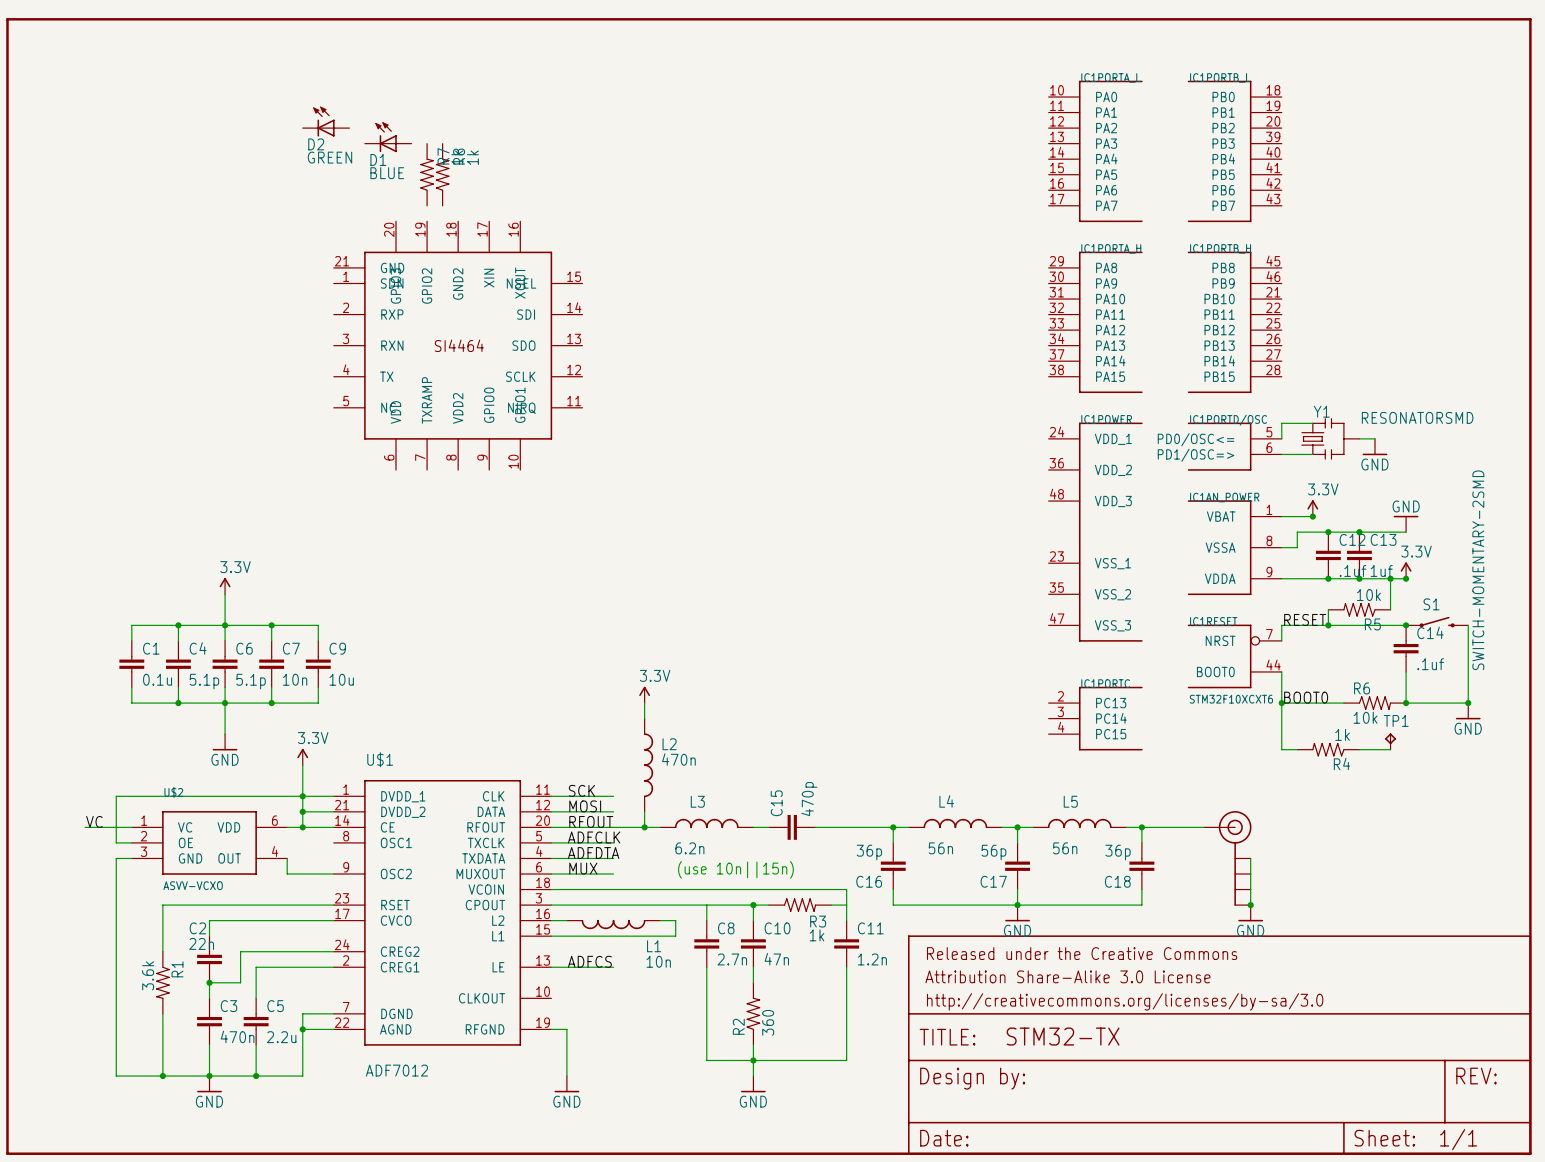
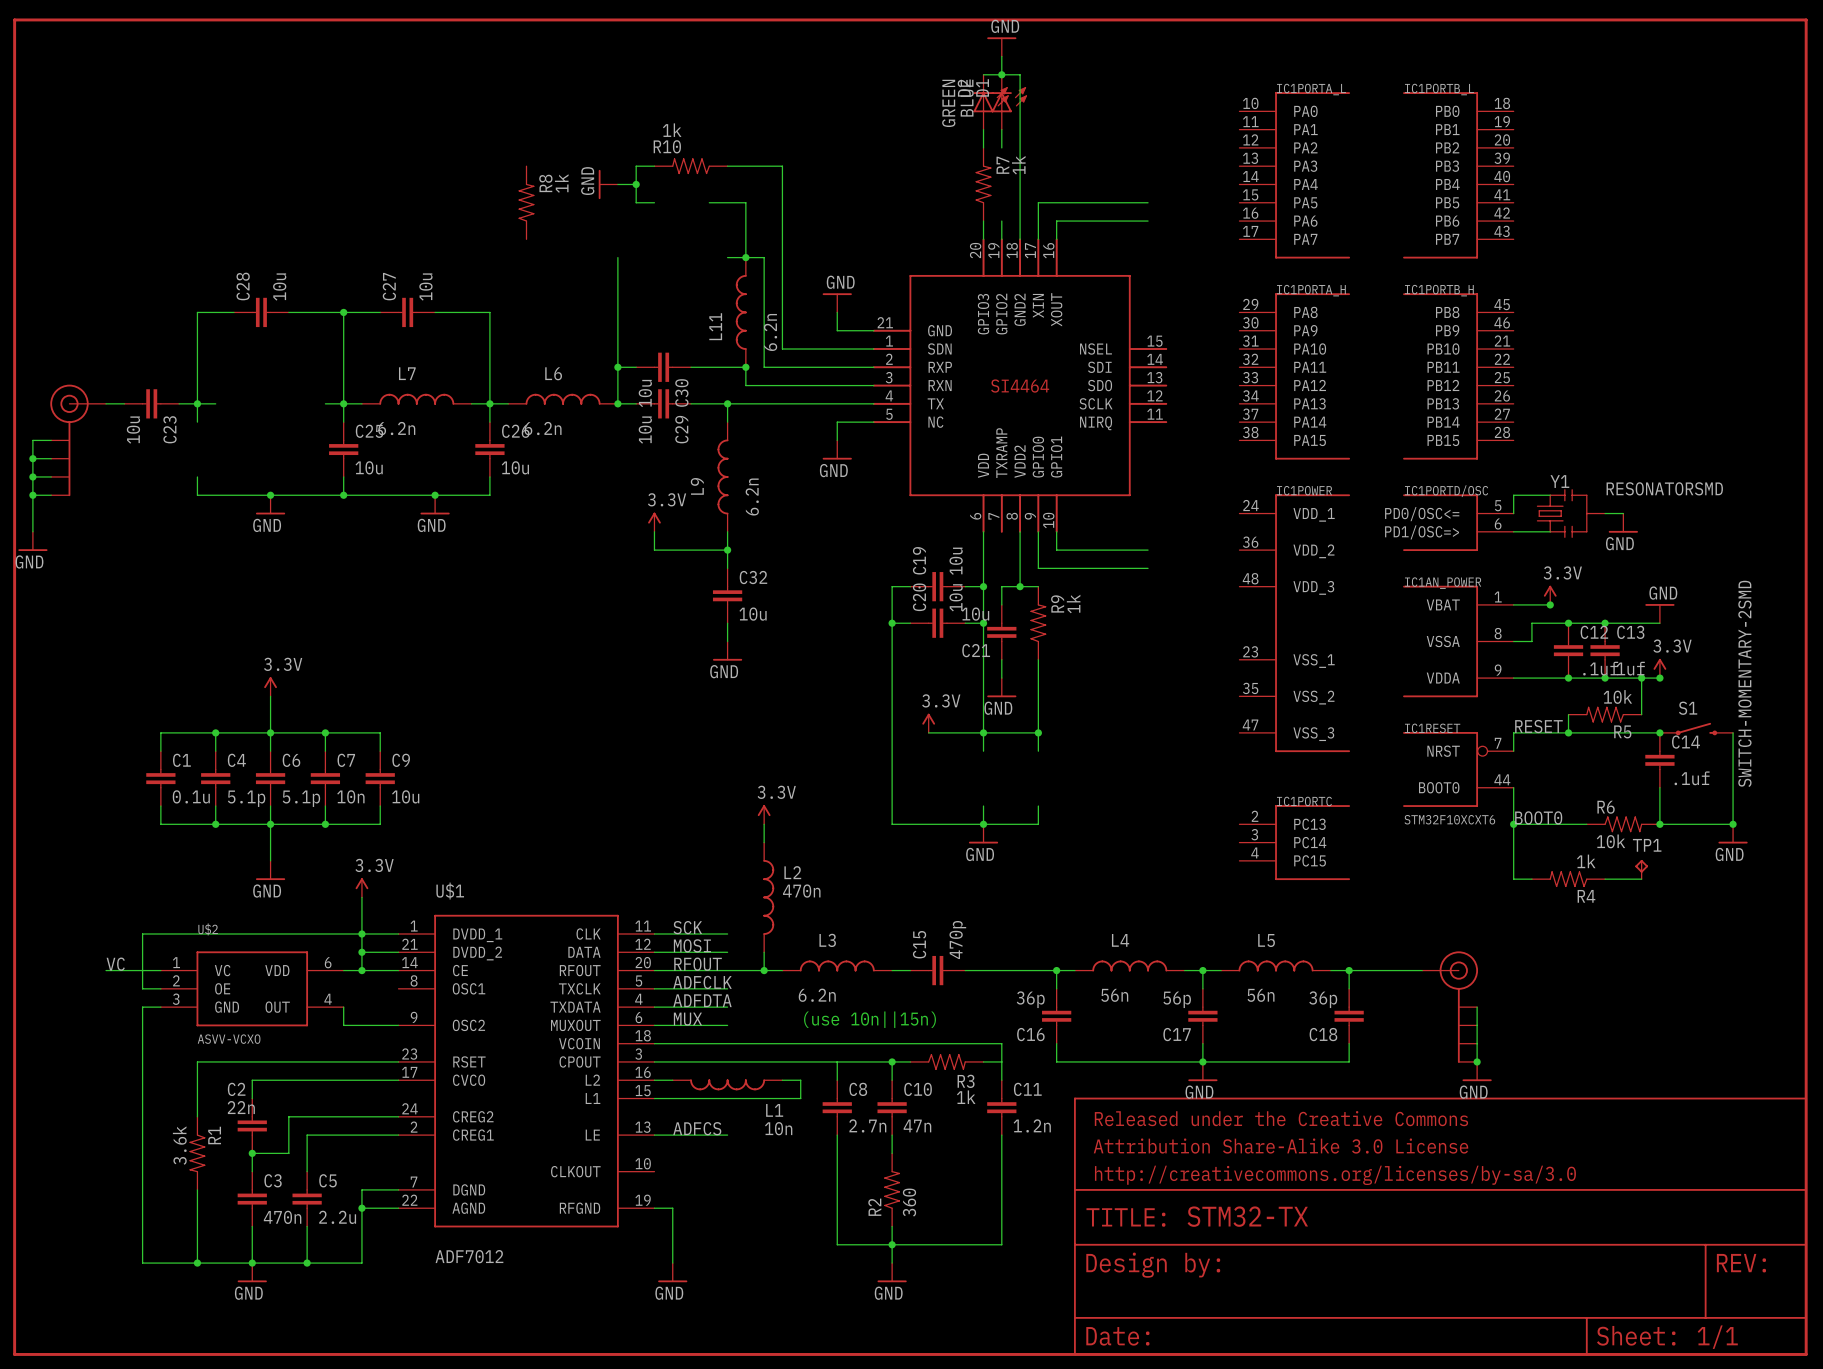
power symbol: none -> GND (1001, 46)
wire: none -> (1001, 56) (1001, 74)
wire: none -> (983, 74) (1020, 74) (1020, 239)
junction: none -> (1001, 74)
wire: none -> (983, 129) (983, 147)
wire: none -> (1001, 129) (1001, 147)
D2 rotation: 0° (323, 121) -> 90° clockwise (991, 99)
D2 position: (326, 121) -> (991, 102)
D1 rotation: 0° (386, 137) -> 90° clockwise (1009, 99)
D1 position: (388, 137) -> (1009, 102)
wire: none -> (654, 166) (636, 166) (636, 202) (654, 202)
R10: none -> 1k (691, 166)
wire: none -> (727, 166) (782, 166) (782, 349) (873, 349)
power symbol: none -> GND (608, 184)
wire: none -> (617, 184) (636, 184)
junction: none -> (636, 184)
R7 position: (427, 174) -> (983, 184)
wire: none -> (709, 202) (745, 202) (745, 257)
wire: none -> (1148, 202) (1038, 202) (1038, 239)
wire: none -> (983, 221) (983, 239)
wire: none -> (1001, 221) (1001, 239)
wire: none -> (1148, 221) (1056, 221) (1056, 239)
wire: none -> (617, 257) (617, 403) (636, 403)
wire: none -> (727, 257) (764, 257) (764, 367) (873, 367)
junction: none -> (745, 257)
power symbol: none -> GND (837, 302)
wire: none -> (233, 312) (197, 312) (197, 422)
C28: none -> 10u (261, 312)
wire: none -> (288, 312) (380, 312)
wire: none -> (343, 312) (343, 422)
junction: none -> (343, 312)
C27: none -> 10u (407, 312)
wire: none -> (435, 312) (489, 312) (489, 422)
L11: none -> 6.2n (741, 312)
wire: none -> (837, 312) (837, 330) (873, 330)
wire: none -> (617, 367) (636, 367)
junction: none -> (617, 367)
C30: none -> 10u (663, 367)
wire: none -> (691, 367) (745, 367) (745, 385) (873, 385)
junction: none -> (745, 367)
part: none -> (1020, 385)
L7: none -> 6.2n (416, 399)
L6: none -> 6.2n (563, 399)
wire: none -> (106, 403) (124, 403)
C23: none -> 10u (151, 403)
wire: none -> (179, 403) (215, 403)
junction: none -> (197, 403)
wire: none -> (325, 403) (361, 403)
junction: none -> (343, 403)
wire: none -> (471, 403) (508, 403)
junction: none -> (489, 403)
part: (458, 345) -> none
junction: none -> (617, 403)
C29: none -> 10u (663, 403)
wire: none -> (691, 403) (873, 403)
wire: none -> (727, 403) (727, 422)
junction: none -> (727, 403)
wire: none -> (873, 422) (837, 422) (837, 440)
wire: none -> (51, 440) (32, 440) (32, 531)
part: none -> (78, 440)
C25: none -> 10u (343, 449)
C26: none -> 10u (489, 449)
power symbol: none -> GND (837, 450)
wire: none -> (32, 458) (51, 458)
junction: none -> (32, 458)
wire: none -> (32, 476) (51, 476)
junction: none -> (32, 476)
wire: none -> (197, 476) (197, 495) (489, 495) (489, 476)
wire: none -> (343, 476) (343, 495)
L9: none -> 6.2n (723, 476)
wire: none -> (32, 495) (51, 495)
junction: none -> (32, 495)
junction: none -> (270, 495)
junction: none -> (343, 495)
junction: none -> (435, 495)
power symbol: none -> GND (270, 504)
power symbol: none -> GND (435, 504)
power symbol: none -> 3.3V (654, 522)
wire: none -> (654, 531) (654, 550) (727, 550)
wire: none -> (727, 531) (727, 568)
wire: none -> (983, 531) (983, 751)
wire: none -> (1020, 531) (1020, 586)
wire: none -> (1038, 531) (1038, 568) (1148, 568)
wire: none -> (1056, 531) (1056, 550) (1148, 550)
power symbol: none -> GND (32, 541)
junction: none -> (727, 550)
wire: none -> (910, 586) (892, 586) (892, 824) (1038, 824) (1038, 806)
C19: none -> 10u (937, 586)
wire: none -> (965, 586) (983, 586)
junction: none -> (983, 586)
junction: none -> (1020, 586)
wire: none -> (1038, 586) (1001, 586) (1001, 604)
C32: none -> 10u (727, 595)
wire: none -> (727, 623) (727, 641)
wire: none -> (892, 623) (910, 623)
junction: none -> (892, 623)
C20: none -> 10u (937, 623)
wire: none -> (965, 623) (983, 623)
junction: none -> (983, 623)
R9: none -> 1k (1038, 623)
C21: none -> 10u (1001, 632)
power symbol: none -> GND (727, 651)
wire: none -> (1001, 659) (1001, 678)
wire: none -> (1038, 659) (1038, 751)
power symbol: none -> GND (1001, 687)
power symbol: none -> 3.3V (928, 723)
wire: none -> (928, 732) (1038, 732)
junction: none -> (983, 732)
junction: none -> (1038, 732)
wire: none -> (983, 806) (983, 824)
junction: none -> (983, 824)
power symbol: none -> GND (983, 833)

